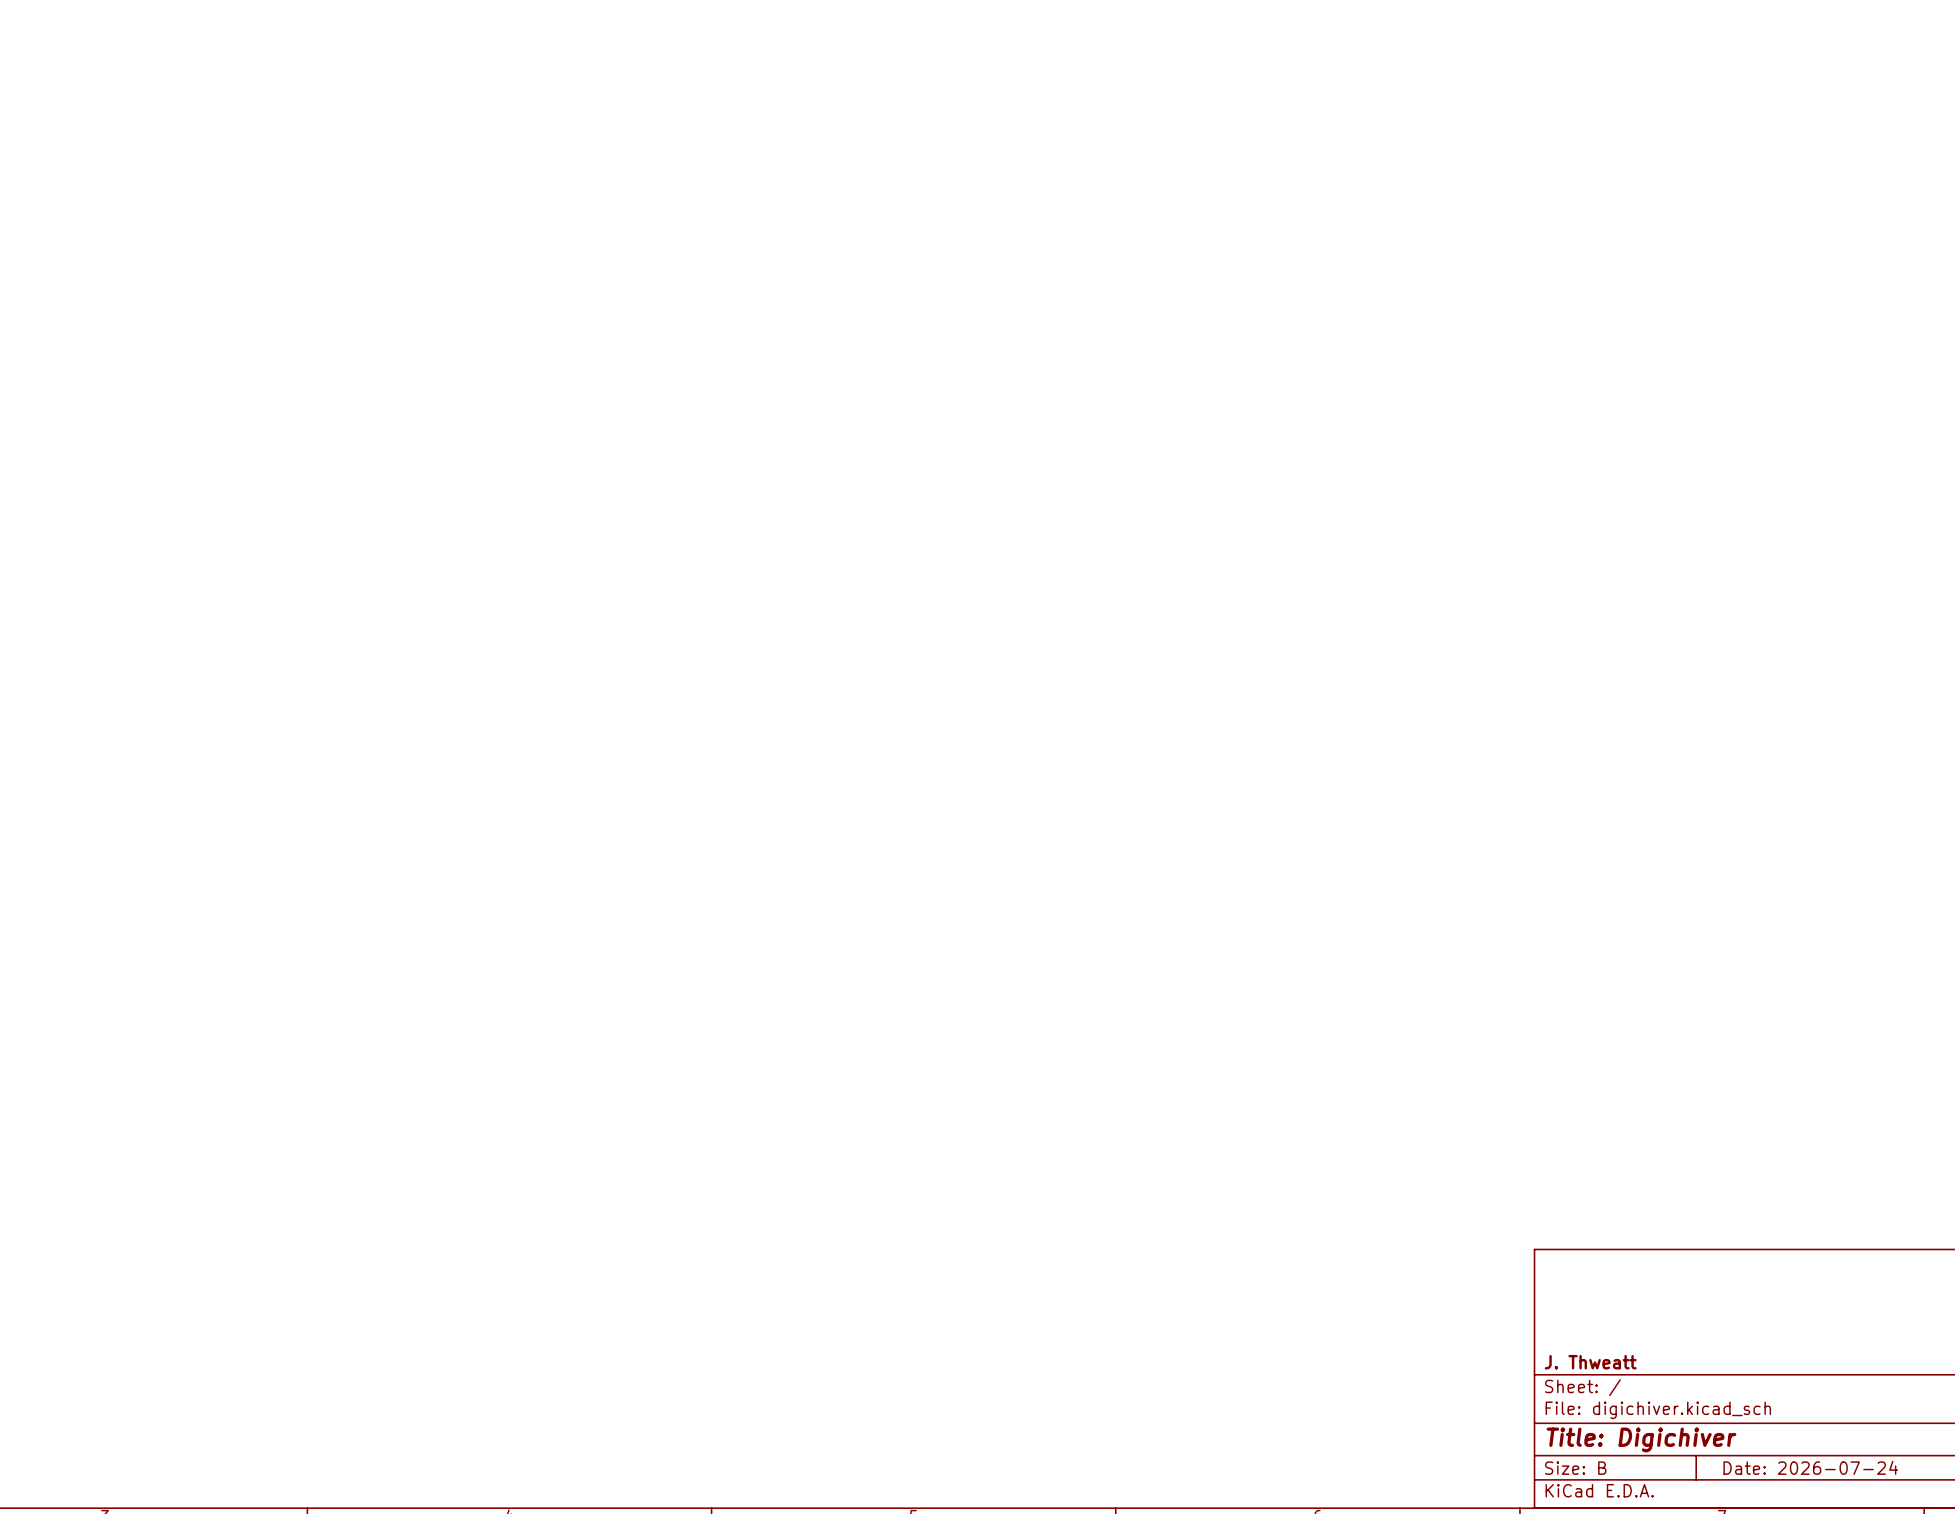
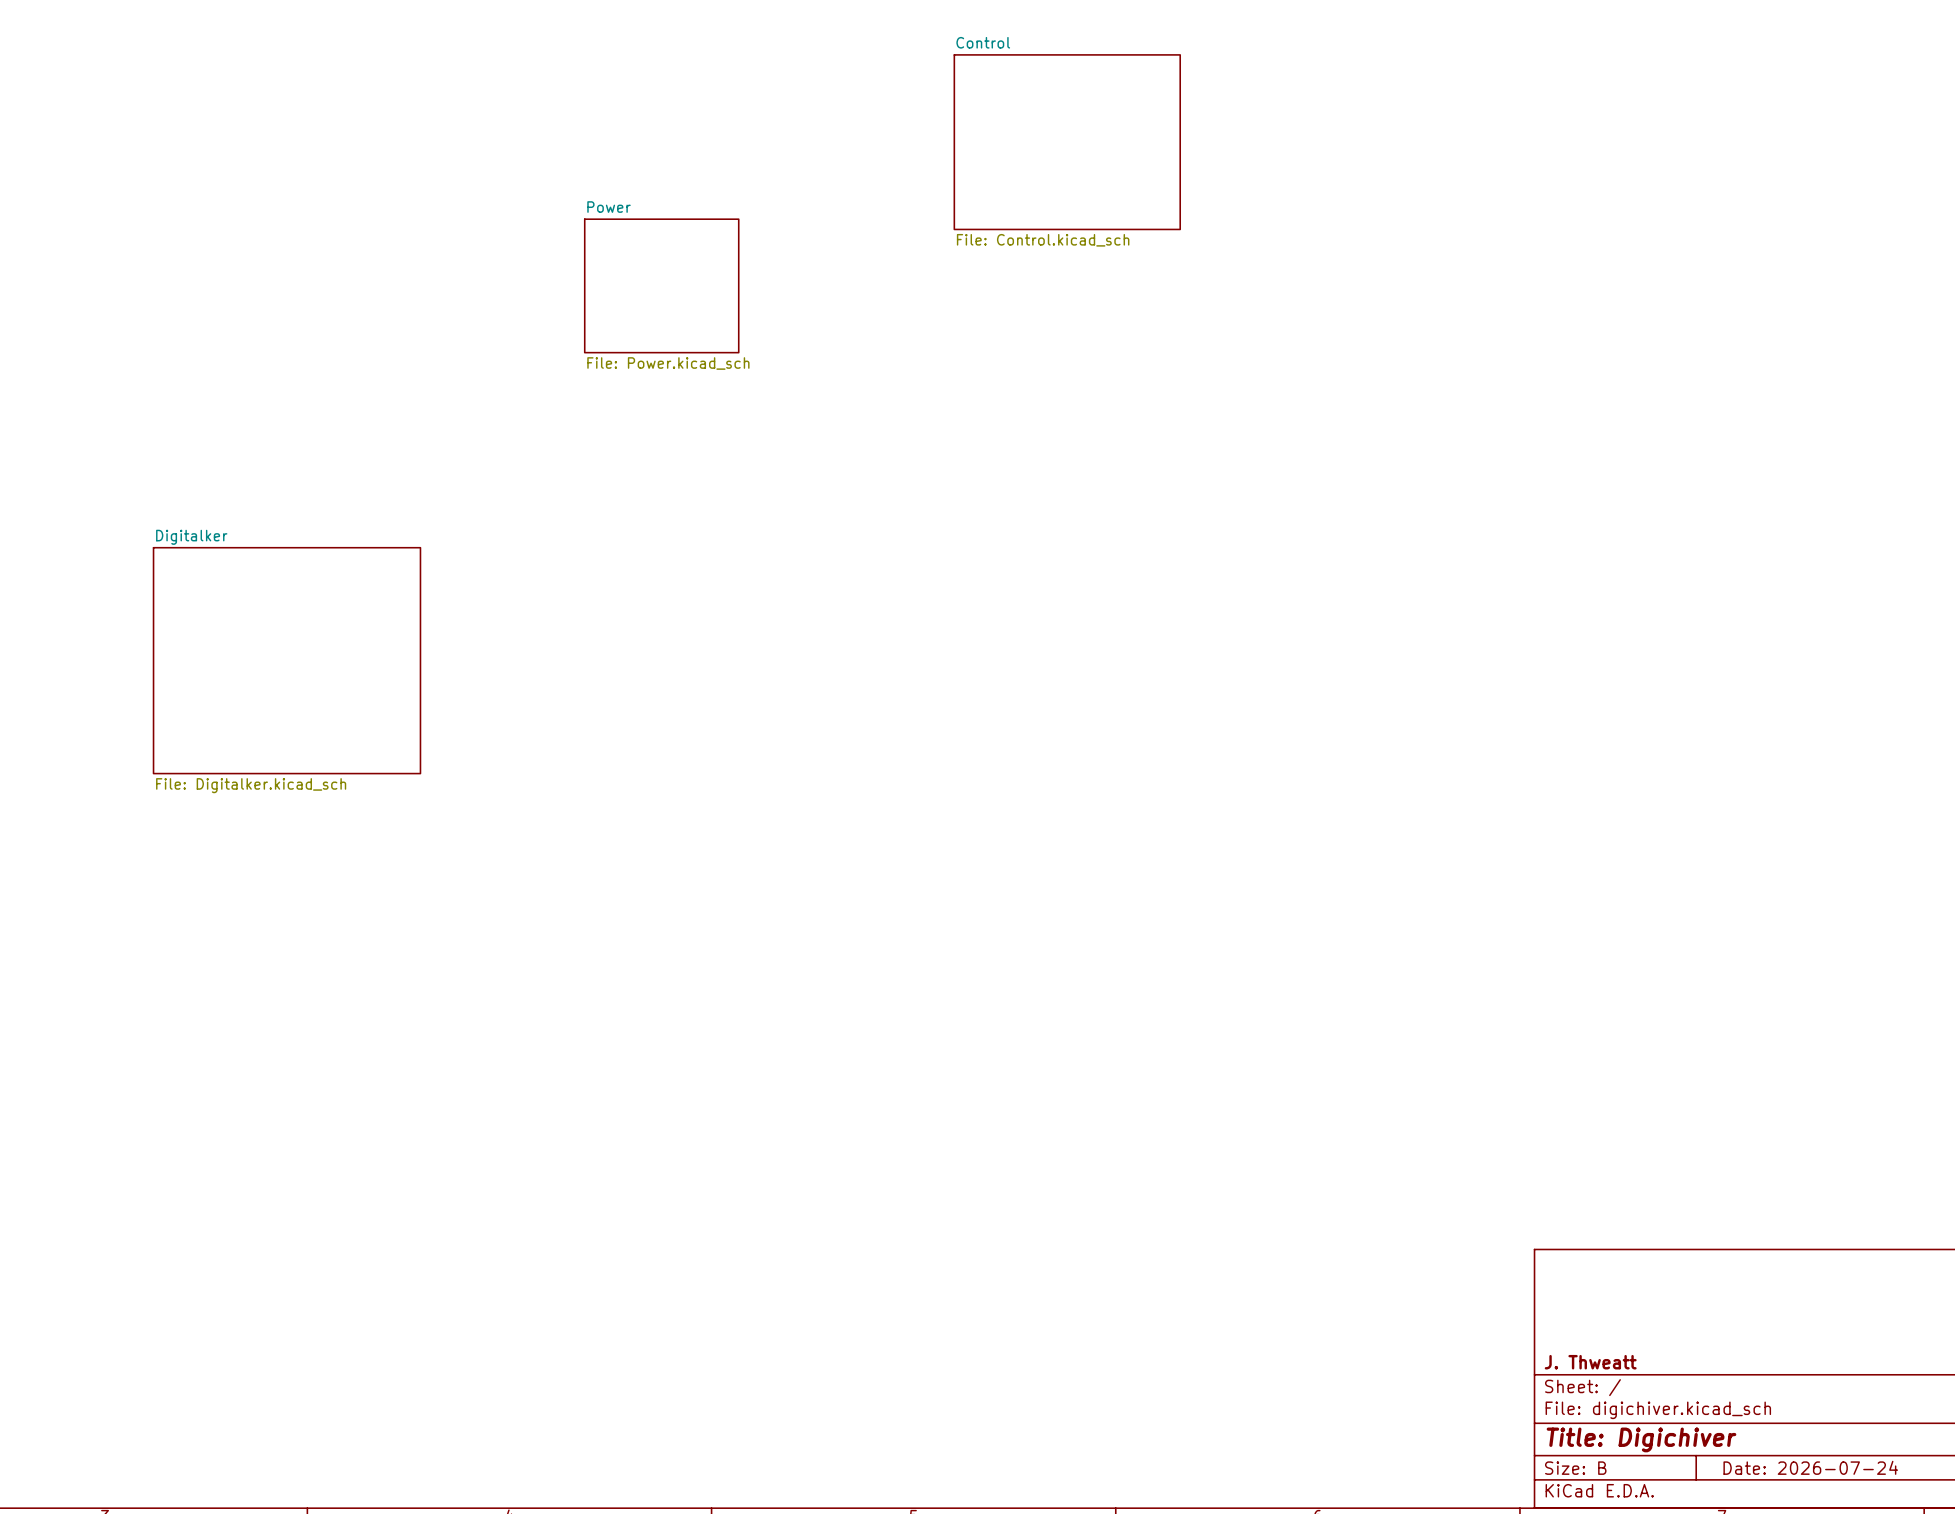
sheet Control: none -> File: Control.kicad_sch (1067, 142)
sheet Power: none -> File: Power.kicad_sch (661, 285)
sheet Digitalker: none -> File: Digitalker.kicad_sch (287, 660)

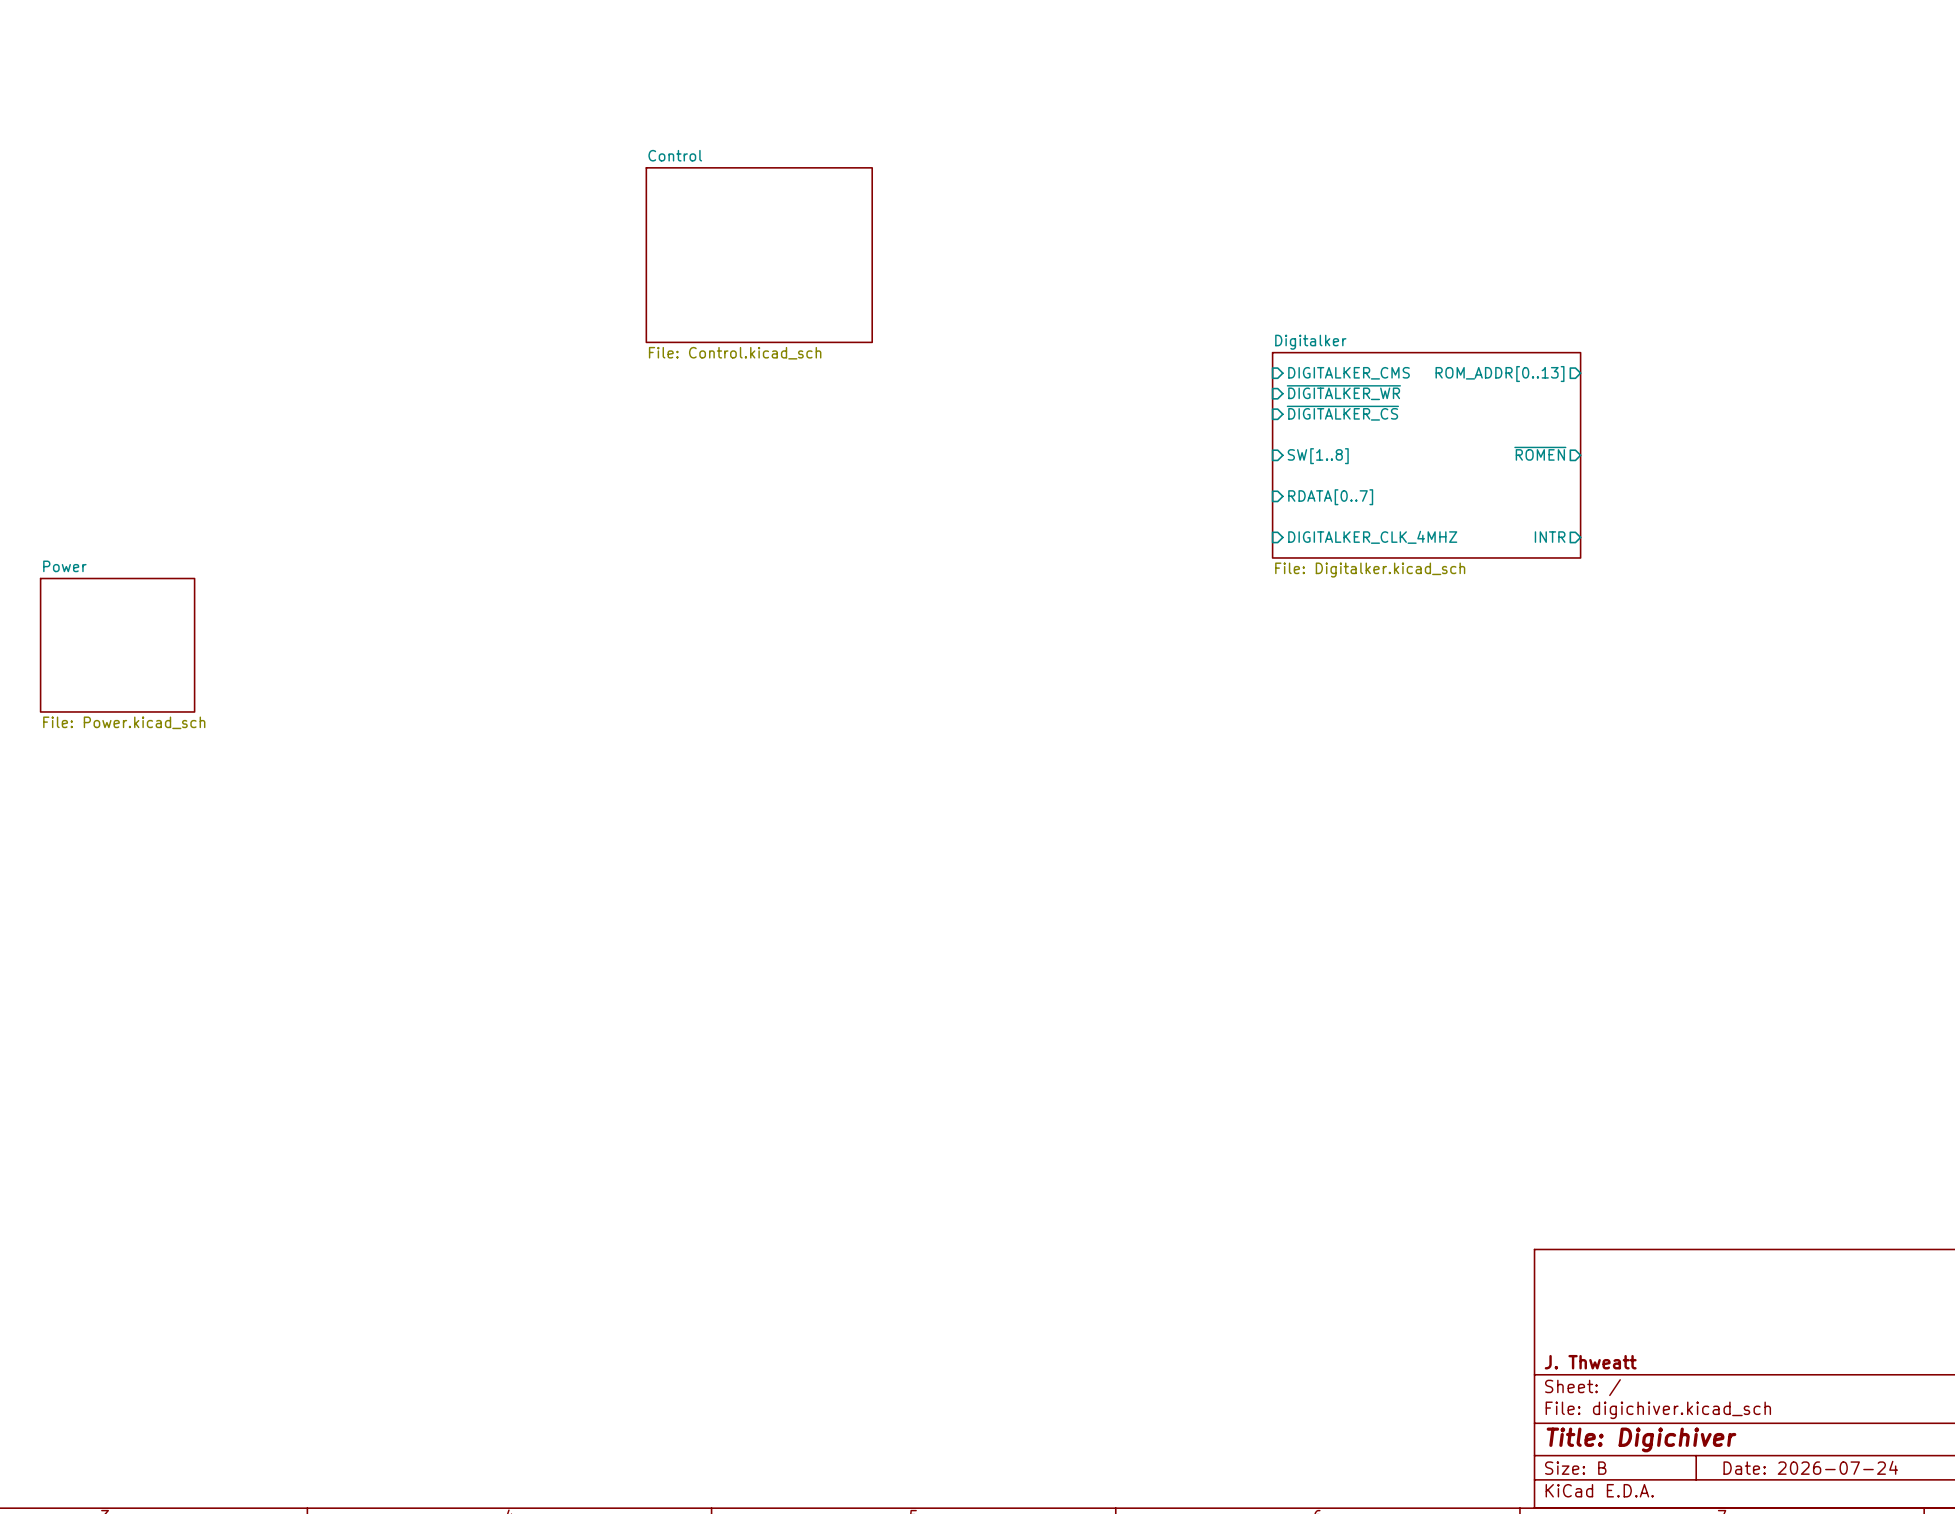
sheet Control: File: Control.kicad_sch (1067, 142) -> none
sheet Control: none -> File: Control.kicad_sch (759, 255)
sheet Power: File: Power.kicad_sch (661, 285) -> none
sheet pin: none -> DIGITALKER_CMS (1349, 373)
sheet pin: none -> ROM_ADDR[0..13] (1500, 374)
sheet pin: none -> ~{DIGITALKER_WR} (1343, 392)
sheet pin: none -> ~{DIGITALKER_CS} (1342, 413)
sheet pin: none -> ~{ROMEN} (1540, 453)
sheet Digitalker: none -> File: Digitalker.kicad_sch (1426, 455)
sheet pin: none -> SW[1..8] (1318, 456)
sheet pin: none -> RDATA[0..7] (1330, 497)
sheet pin: none -> DIGITALKER_CLK_4MHZ (1372, 537)
sheet pin: none -> INTR (1550, 537)
sheet Power: none -> File: Power.kicad_sch (117, 645)
sheet Digitalker: File: Digitalker.kicad_sch (287, 660) -> none

